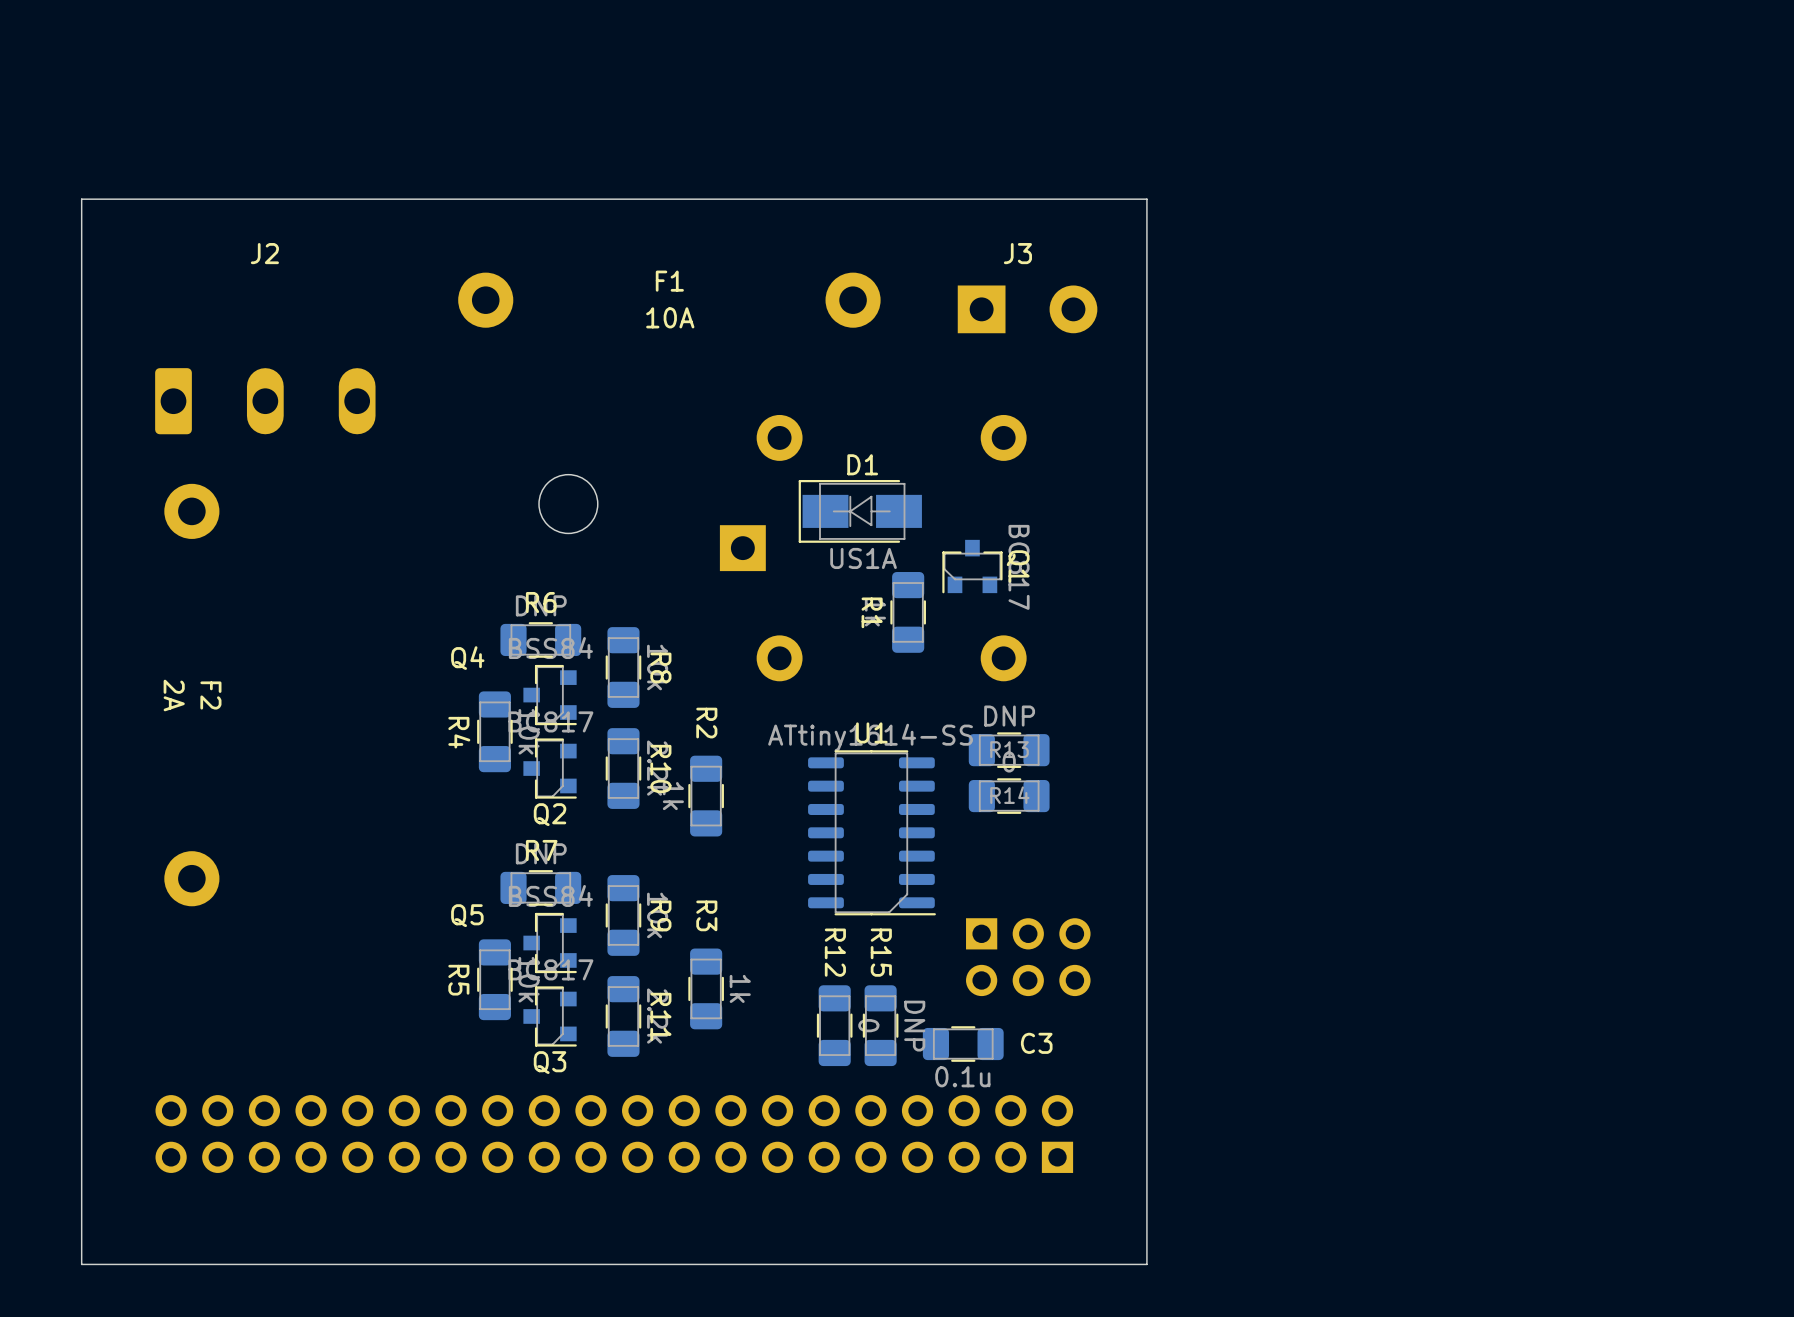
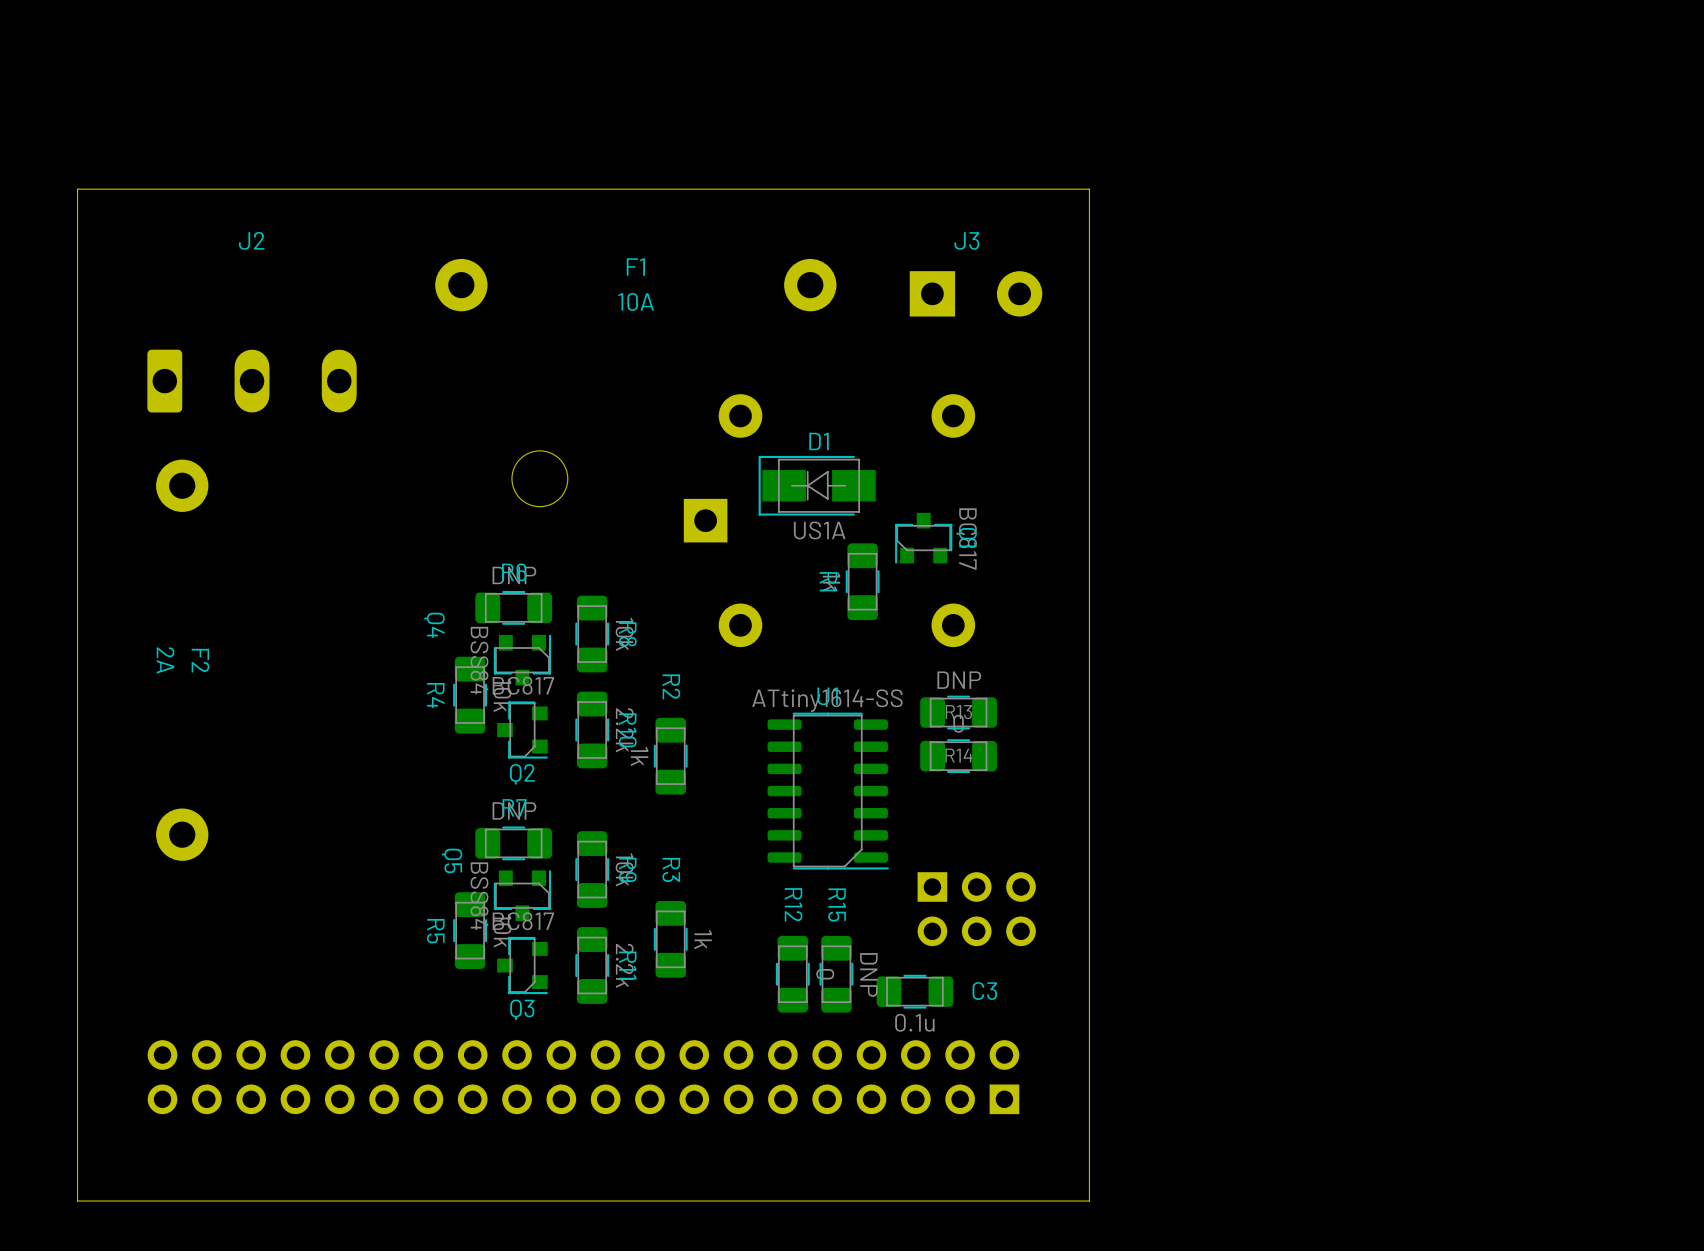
Q4 rotation: 0° (550, 695) -> 90° counterclockwise (522, 660)
Q5 rotation: 0° (550, 943) -> 90° counterclockwise (522, 895)

